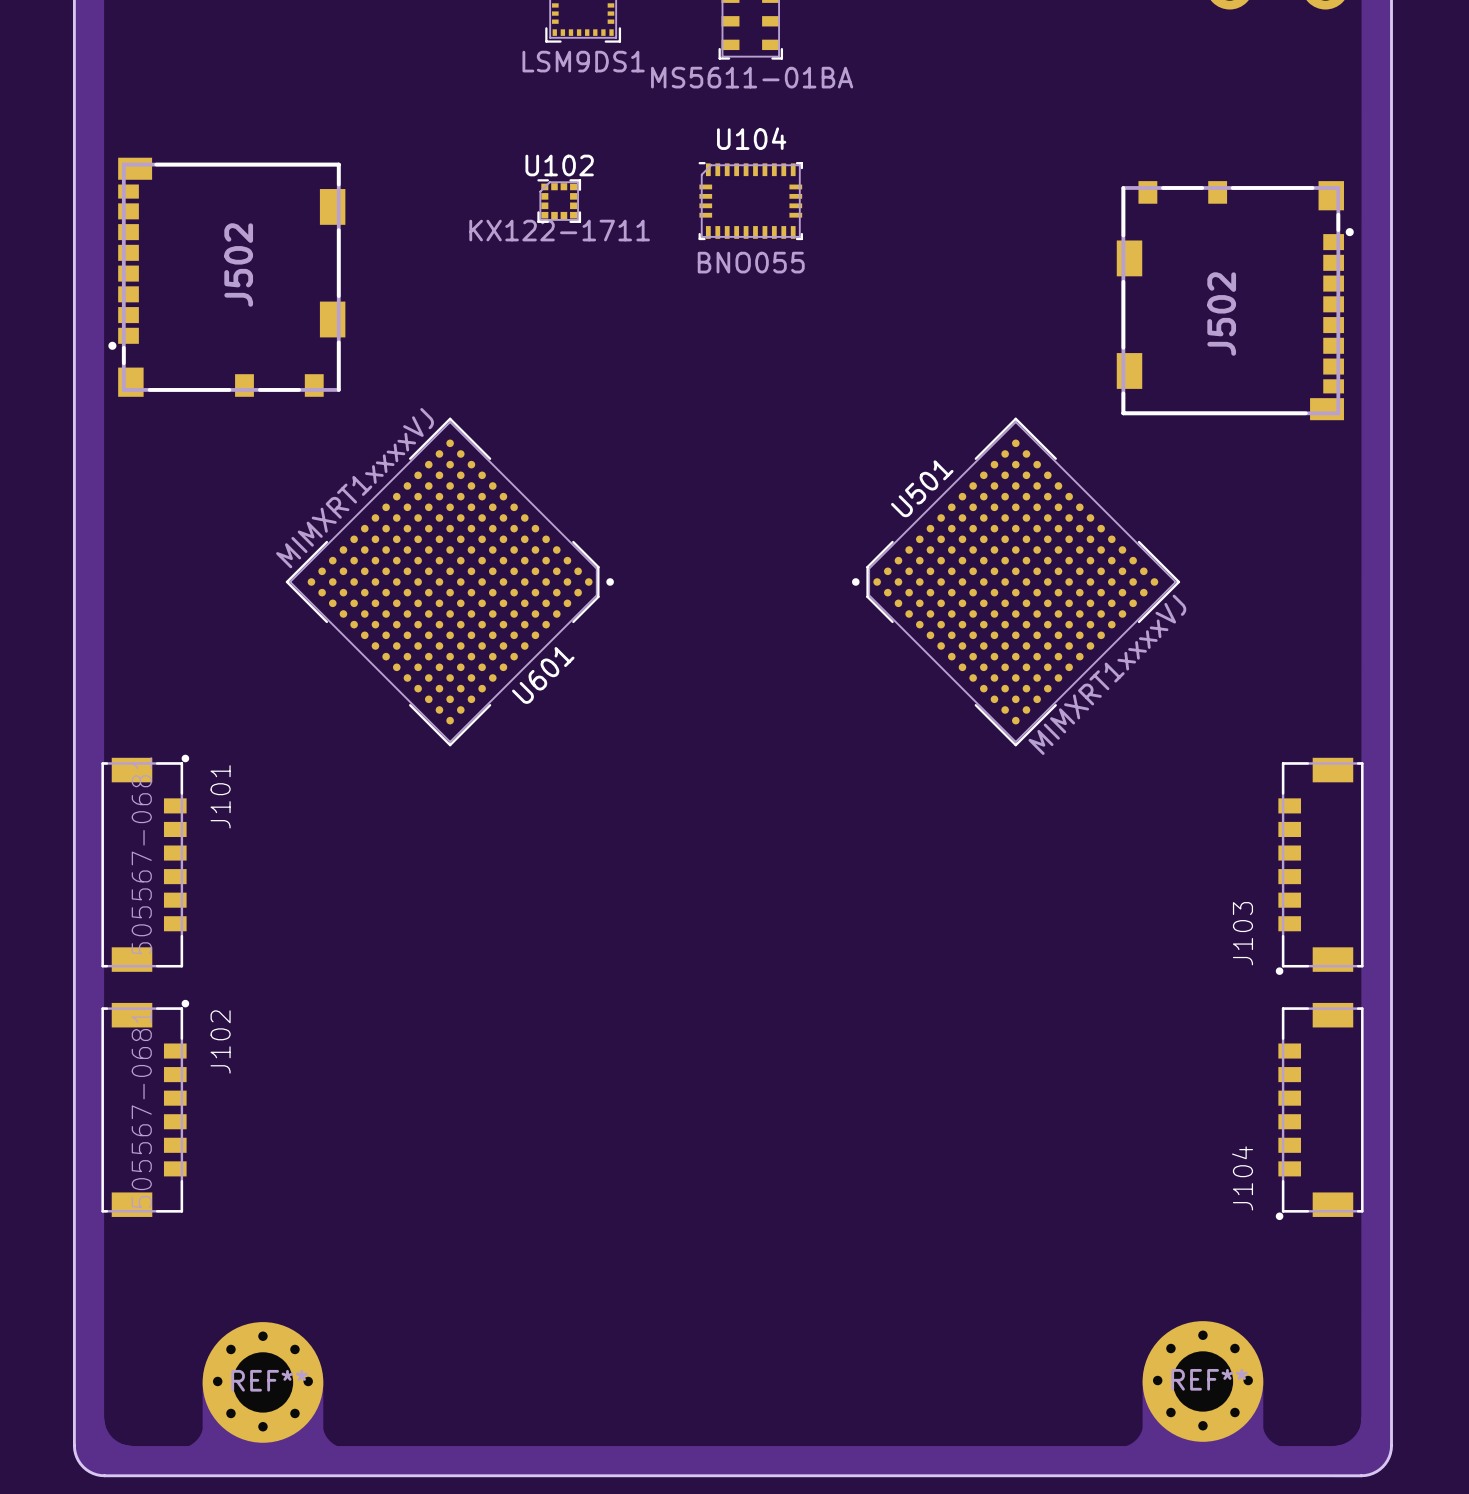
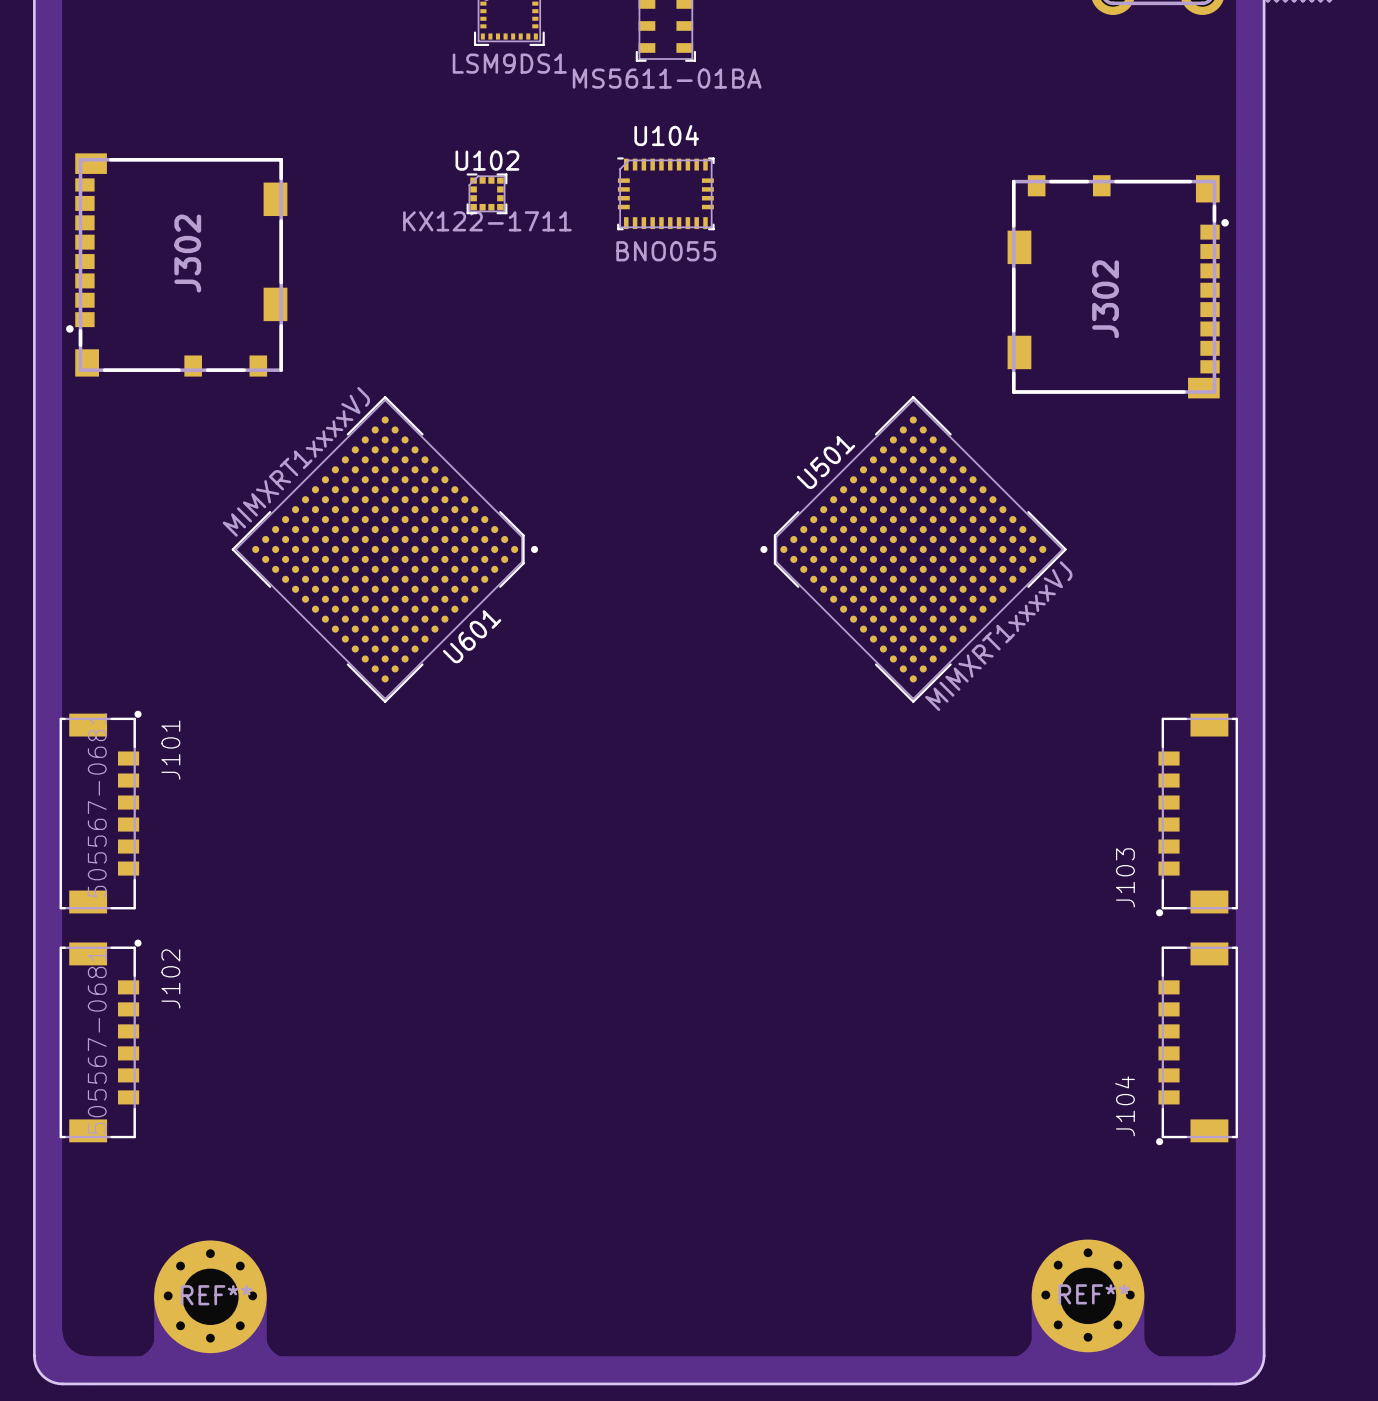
J502 name: J502 (238, 265) -> J302 (187, 253)
J502 name: J502 (1221, 314) -> J302 (1105, 299)

